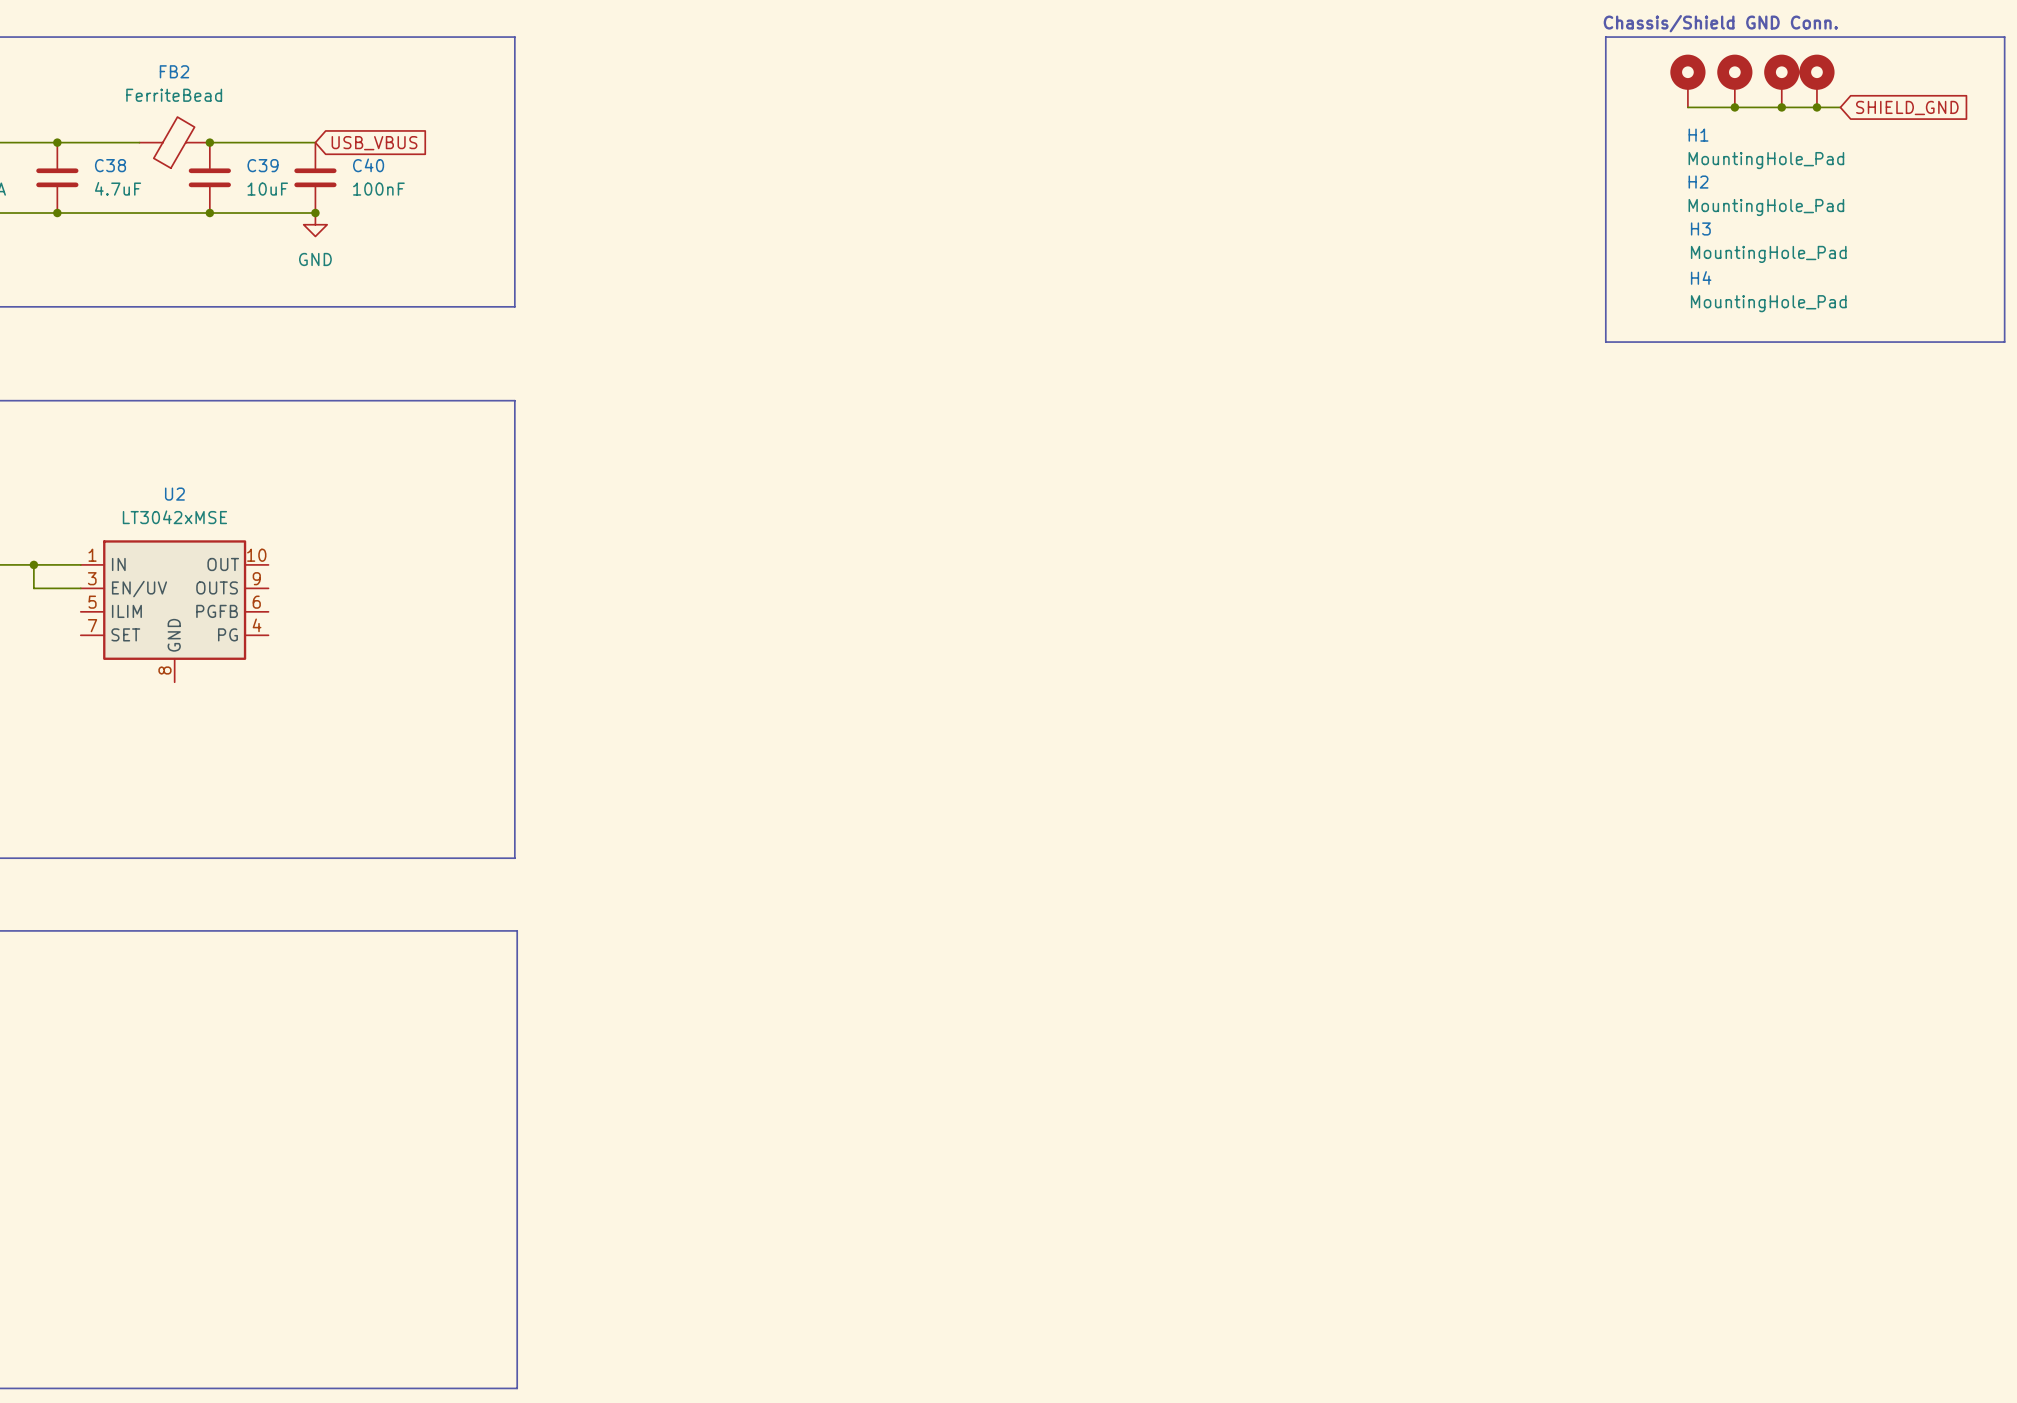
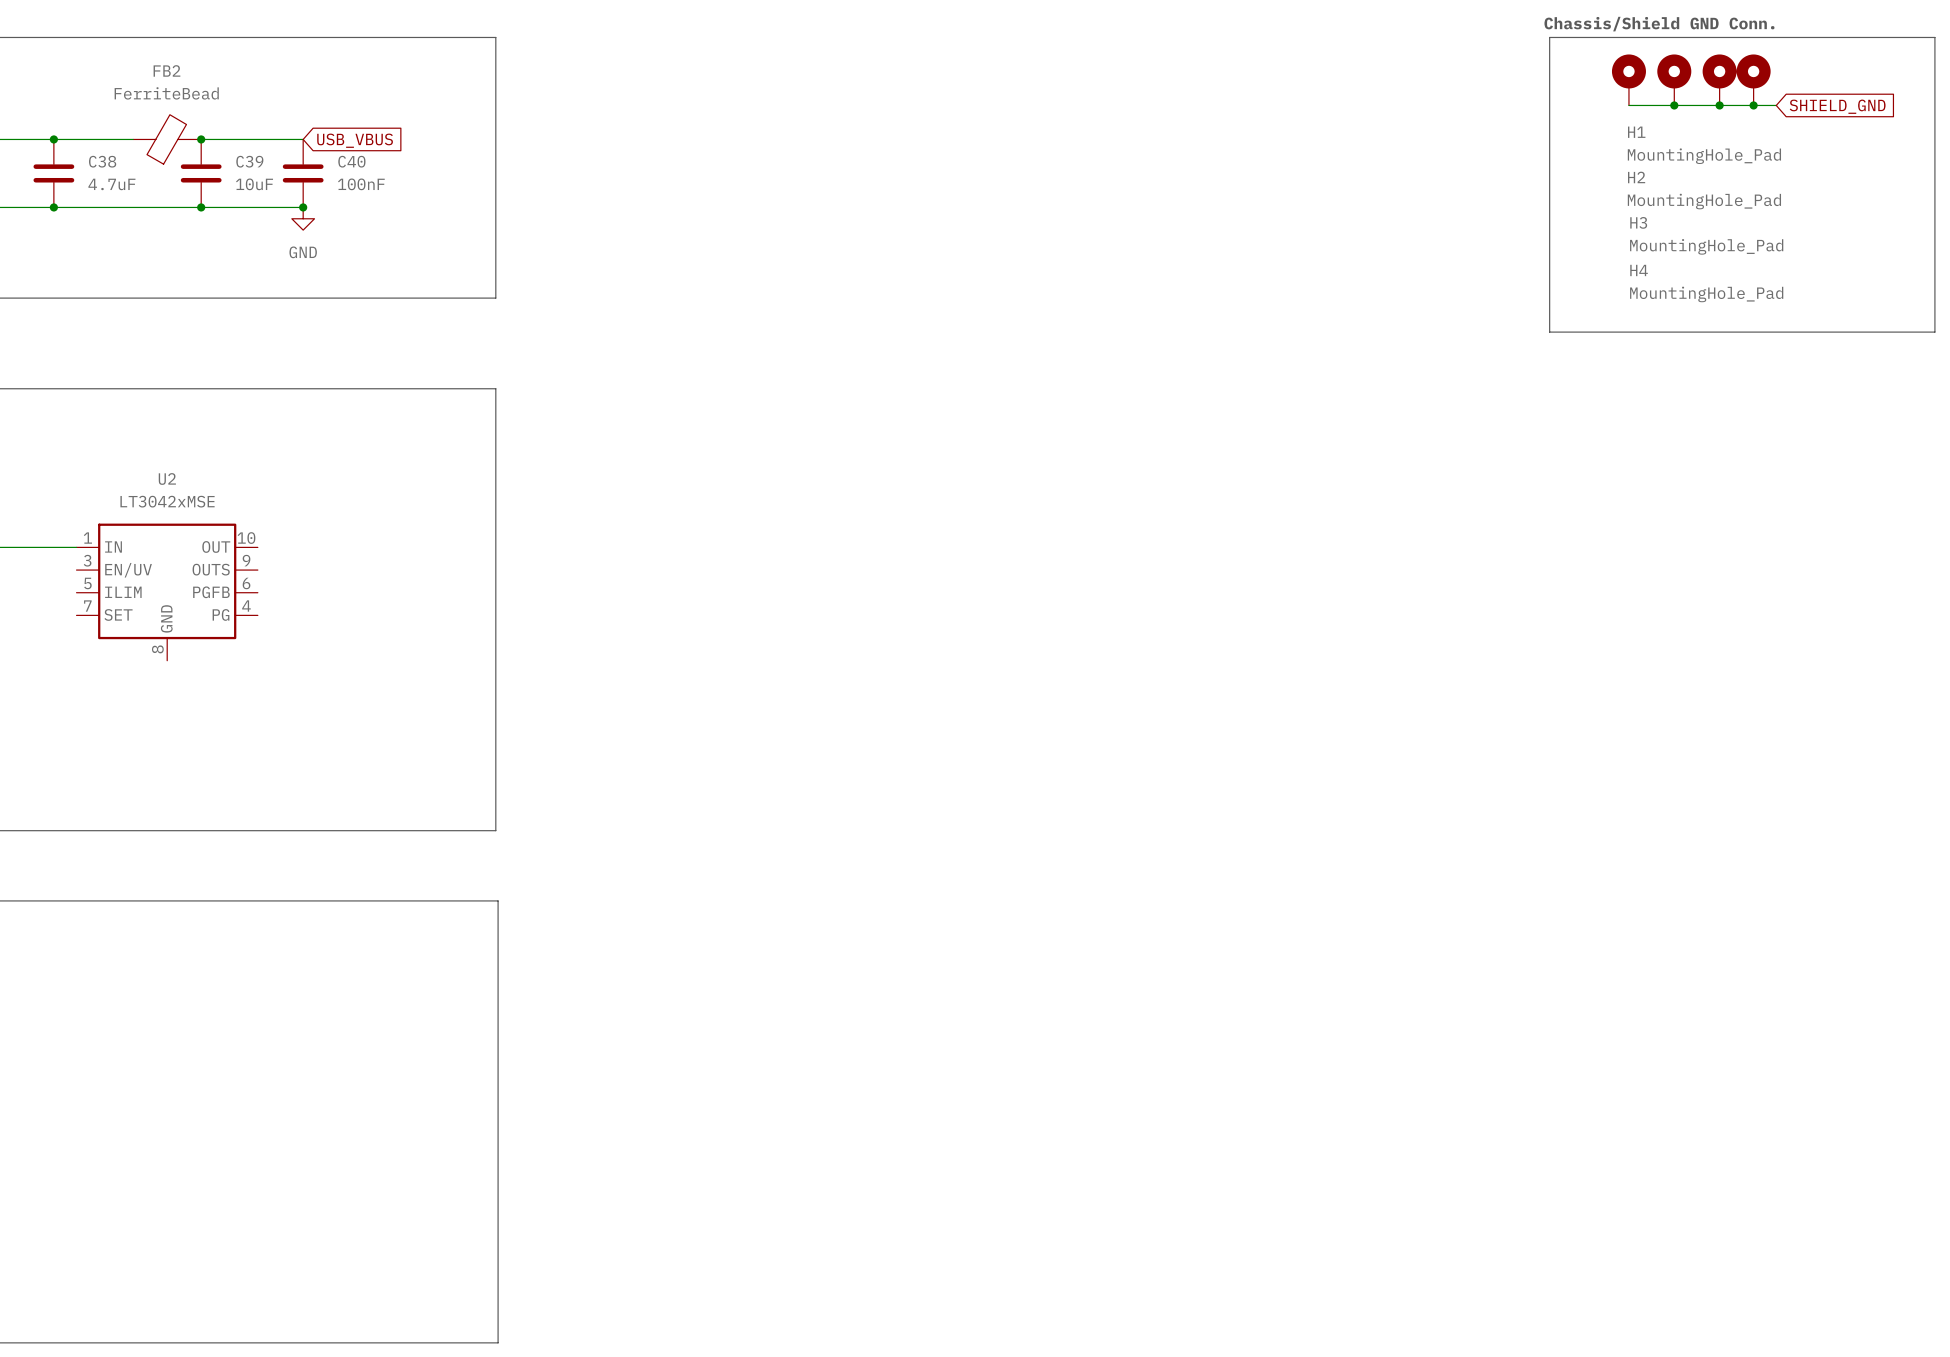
wire: (33, 564) (33, 588) (80, 588) -> none
junction: (33, 564) -> none

